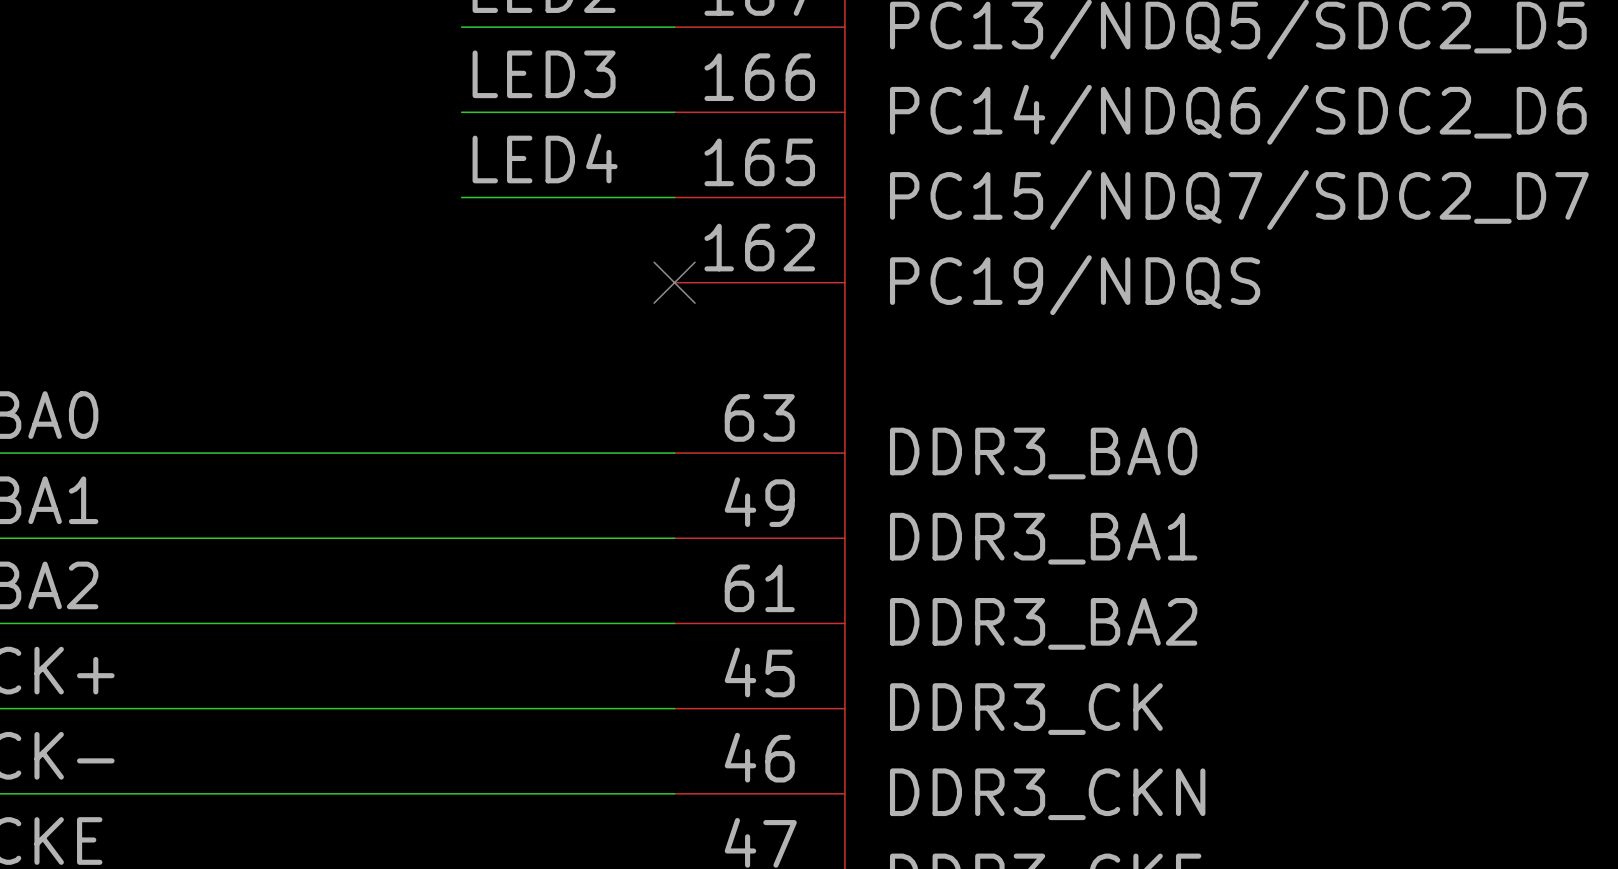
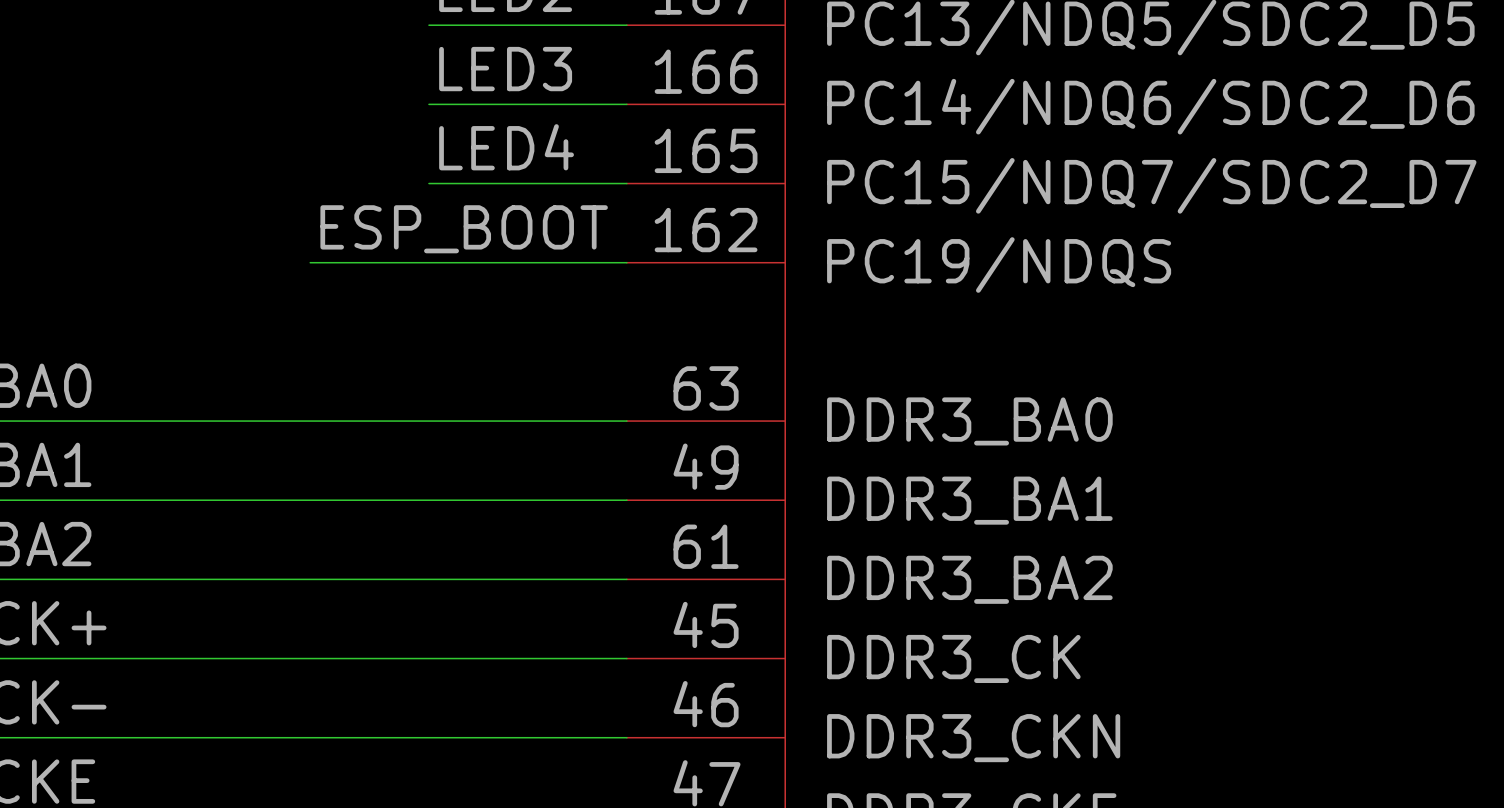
label: none -> ESP_BOOT (464, 229)
wire: none -> (310, 262) (626, 262)
no-connect mark: (674, 282) -> none

